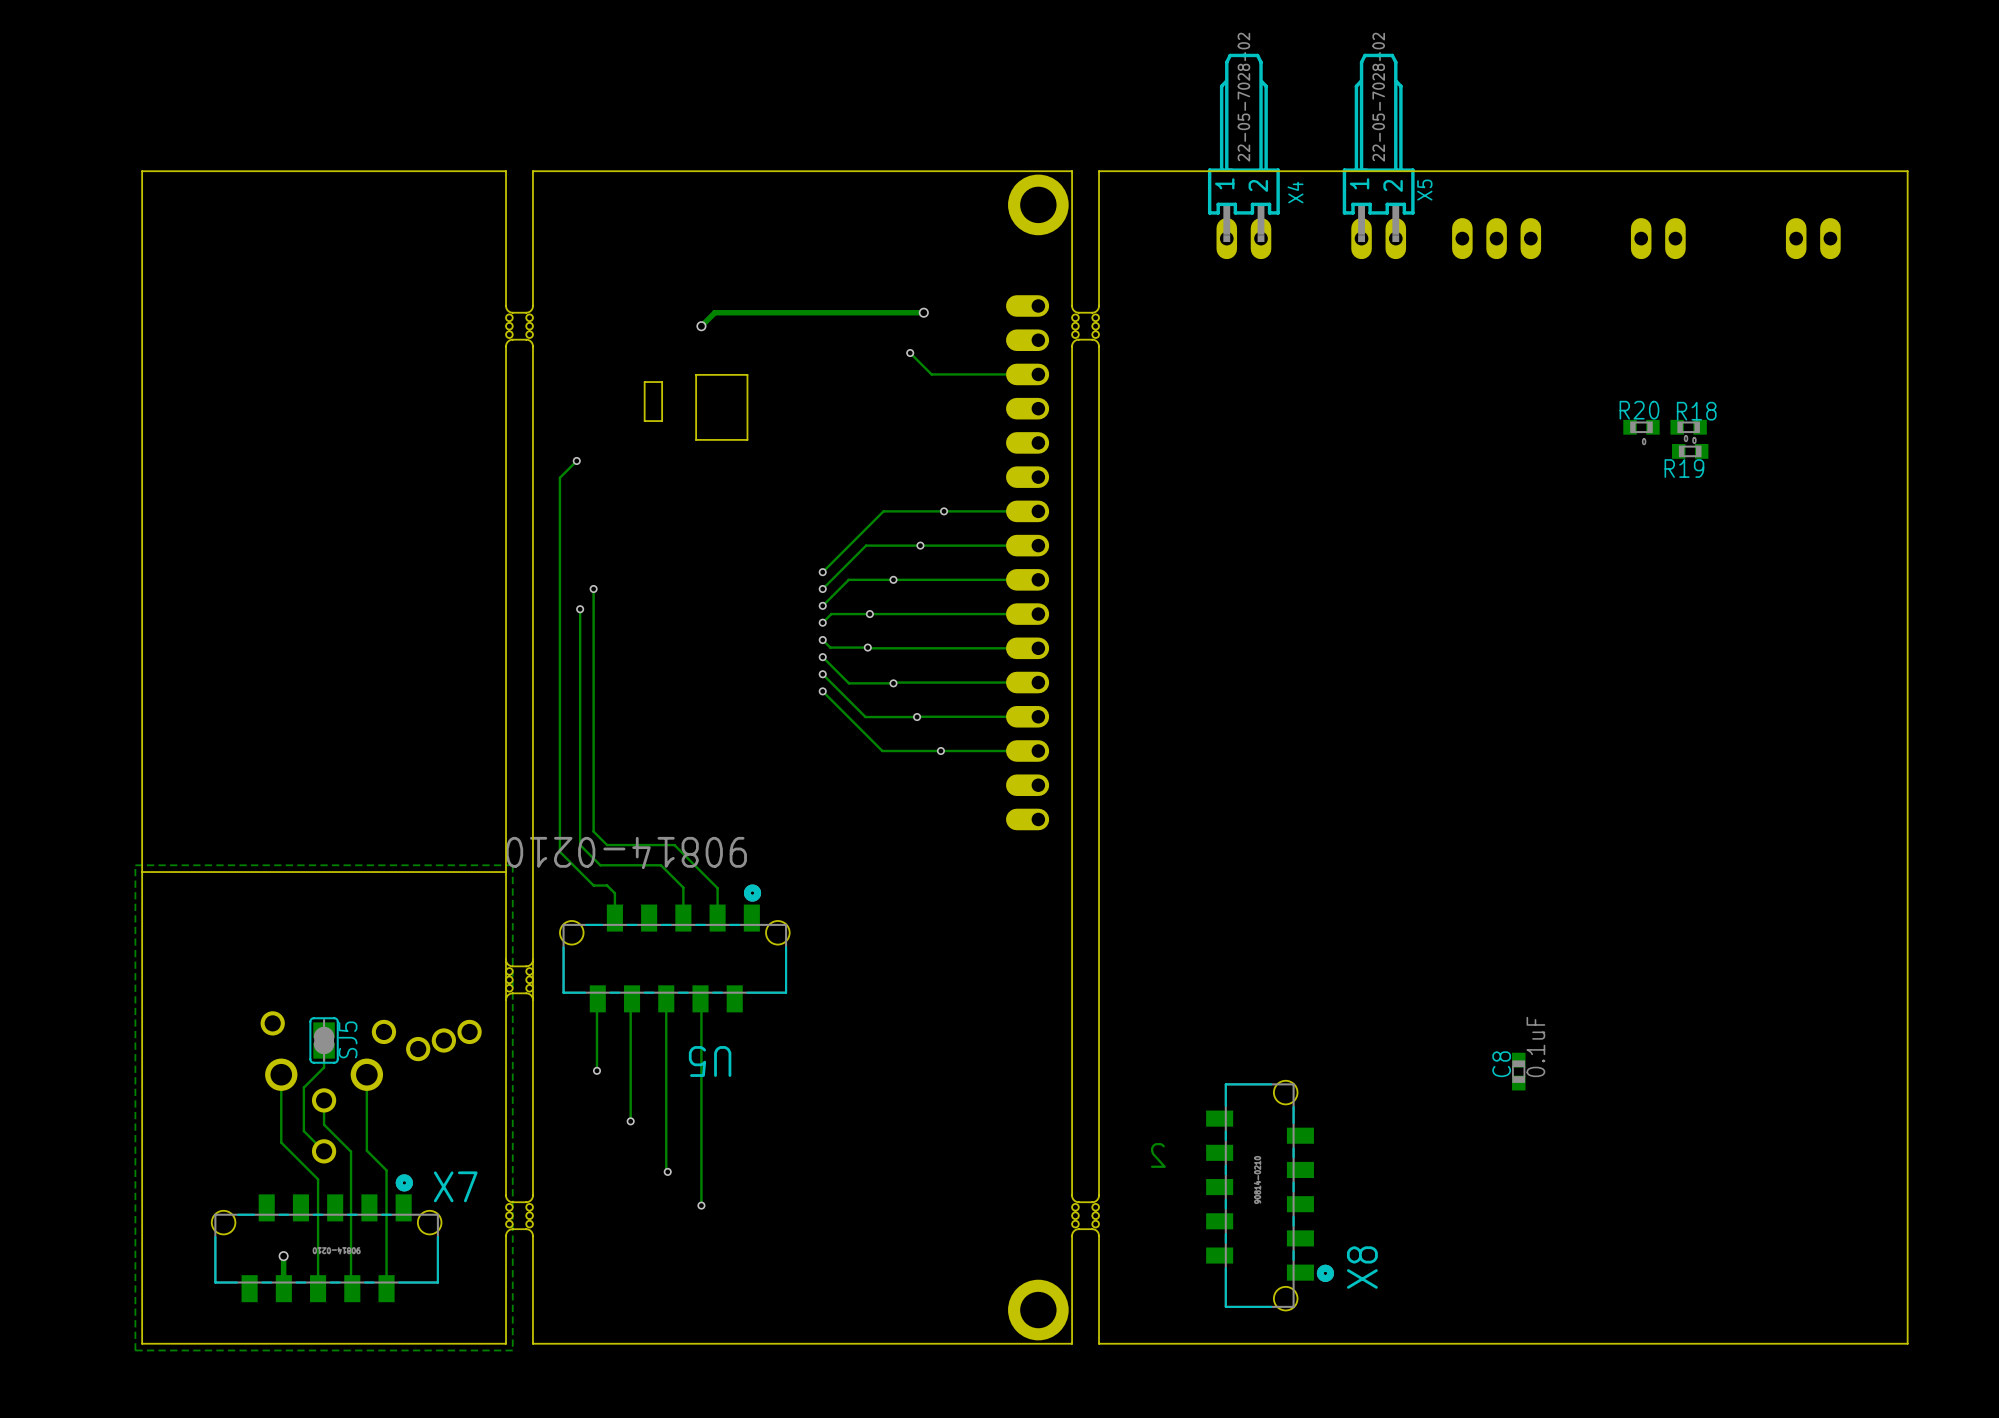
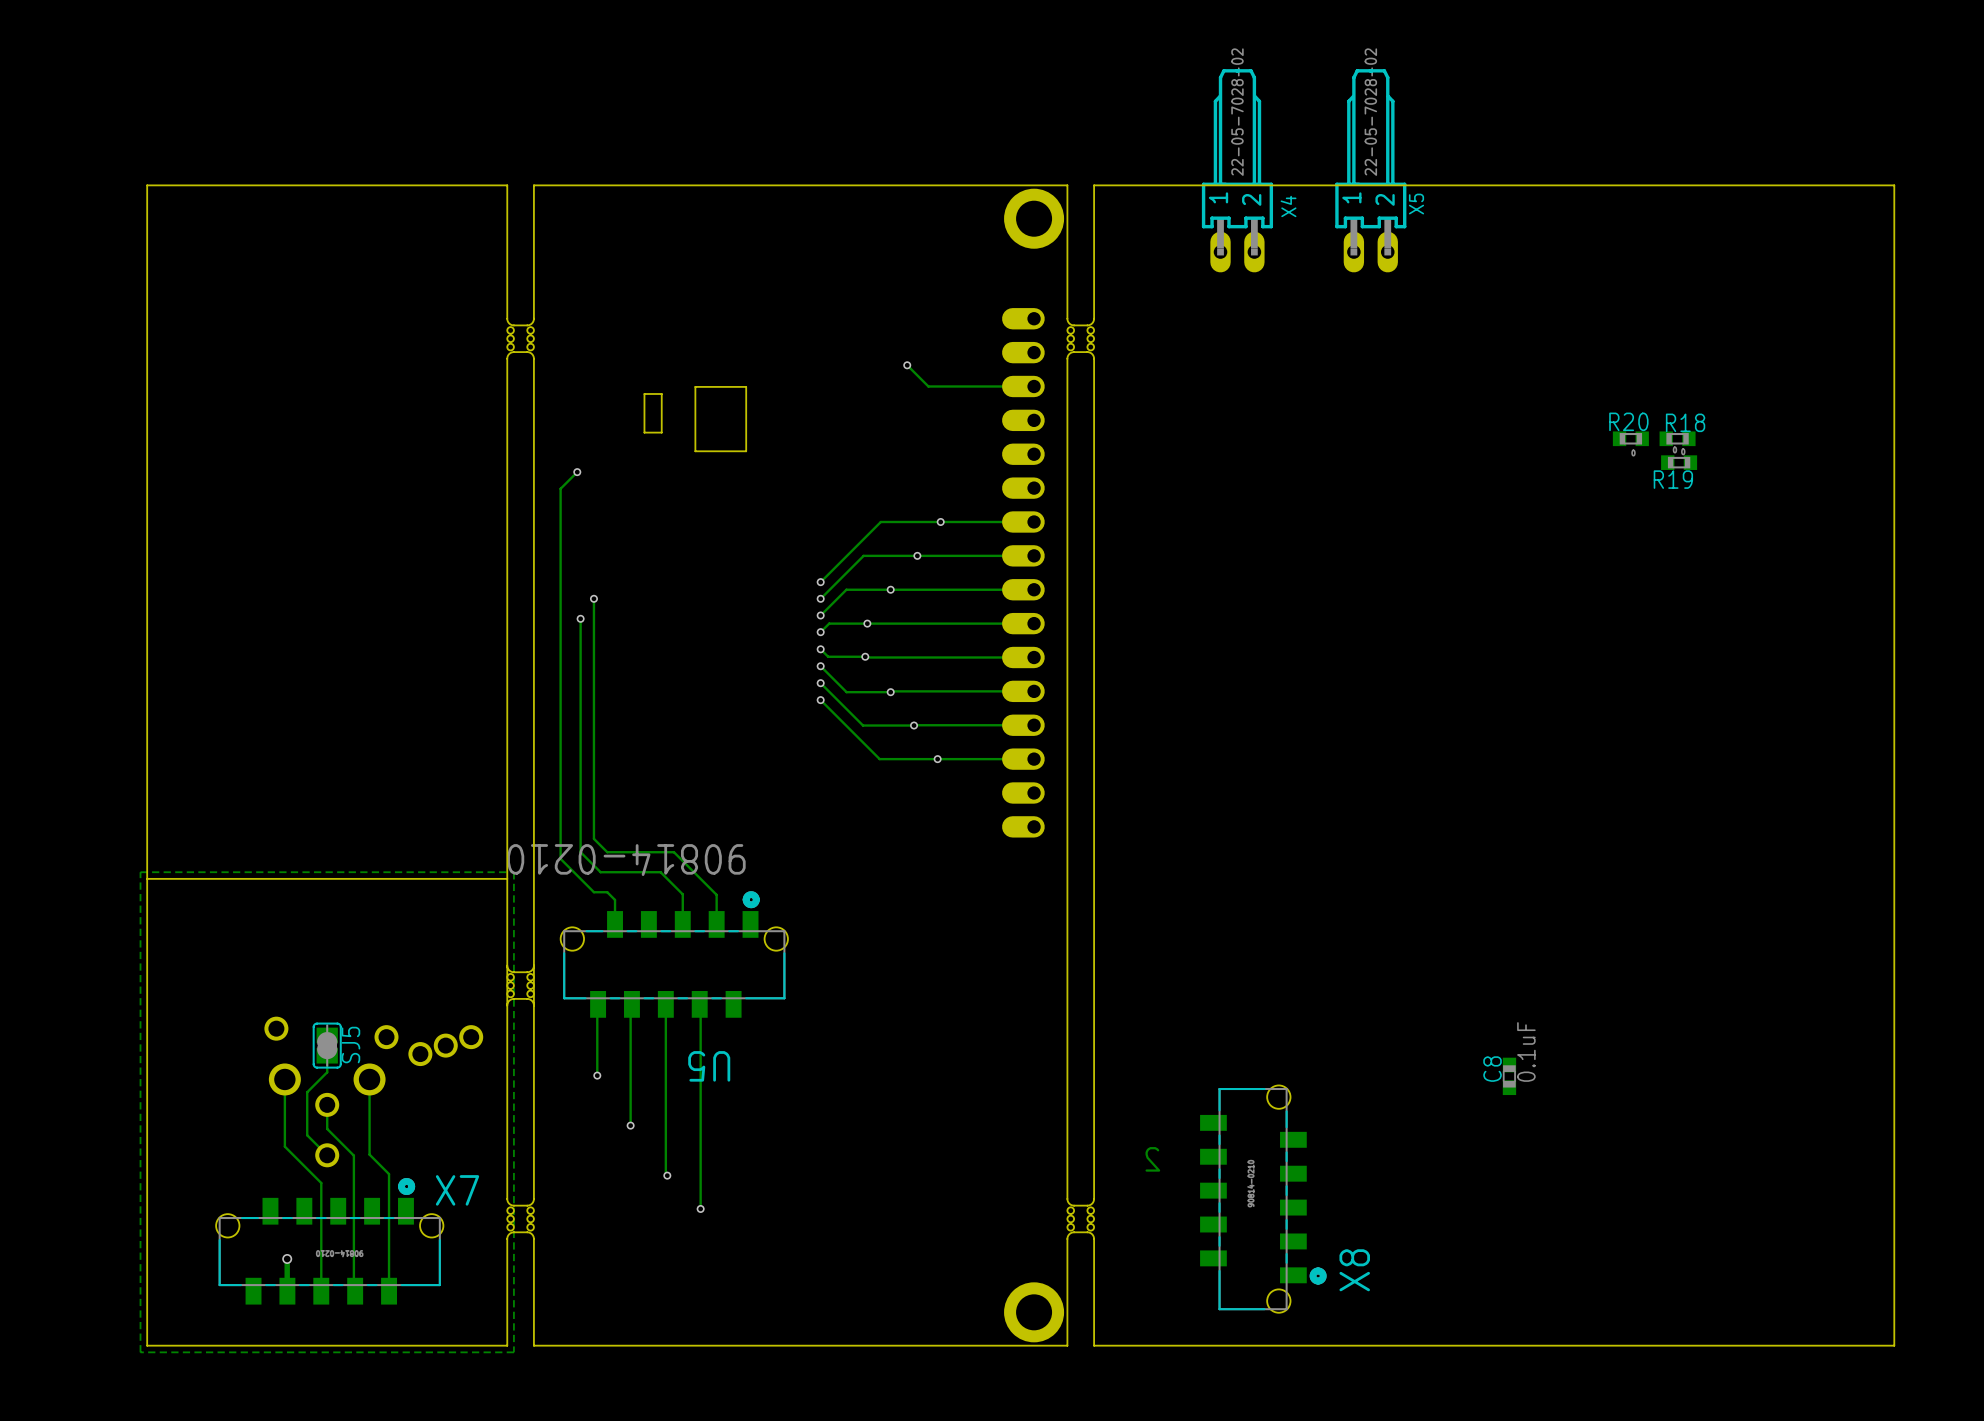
part: (1496, 238) -> none
part: (1658, 238) -> none
part: (1813, 238) -> none
track: (923, 312) (714, 312) (701, 326) -> none
via: (923, 312) -> none
via: (701, 326) -> none

